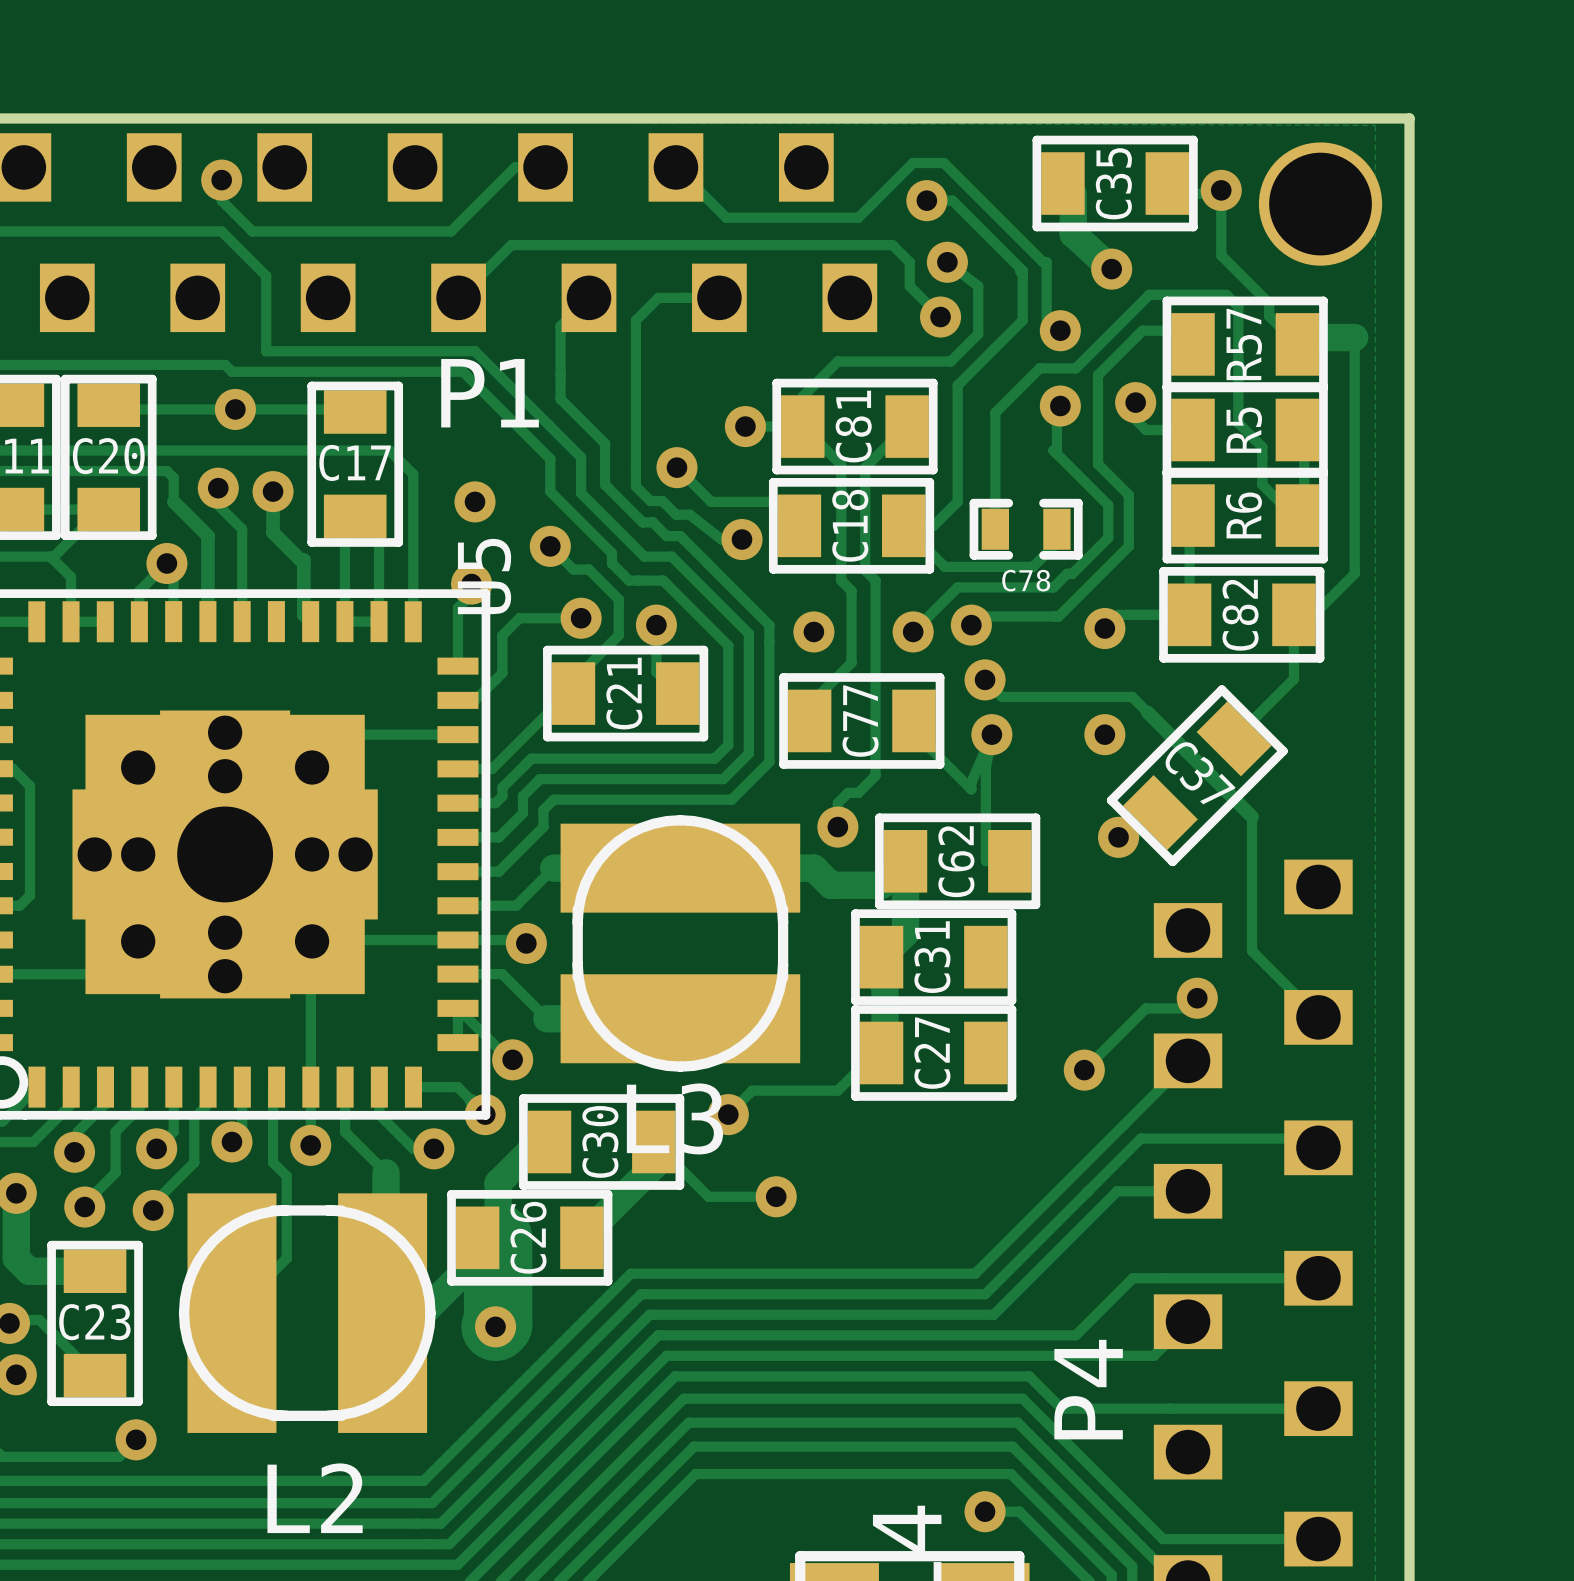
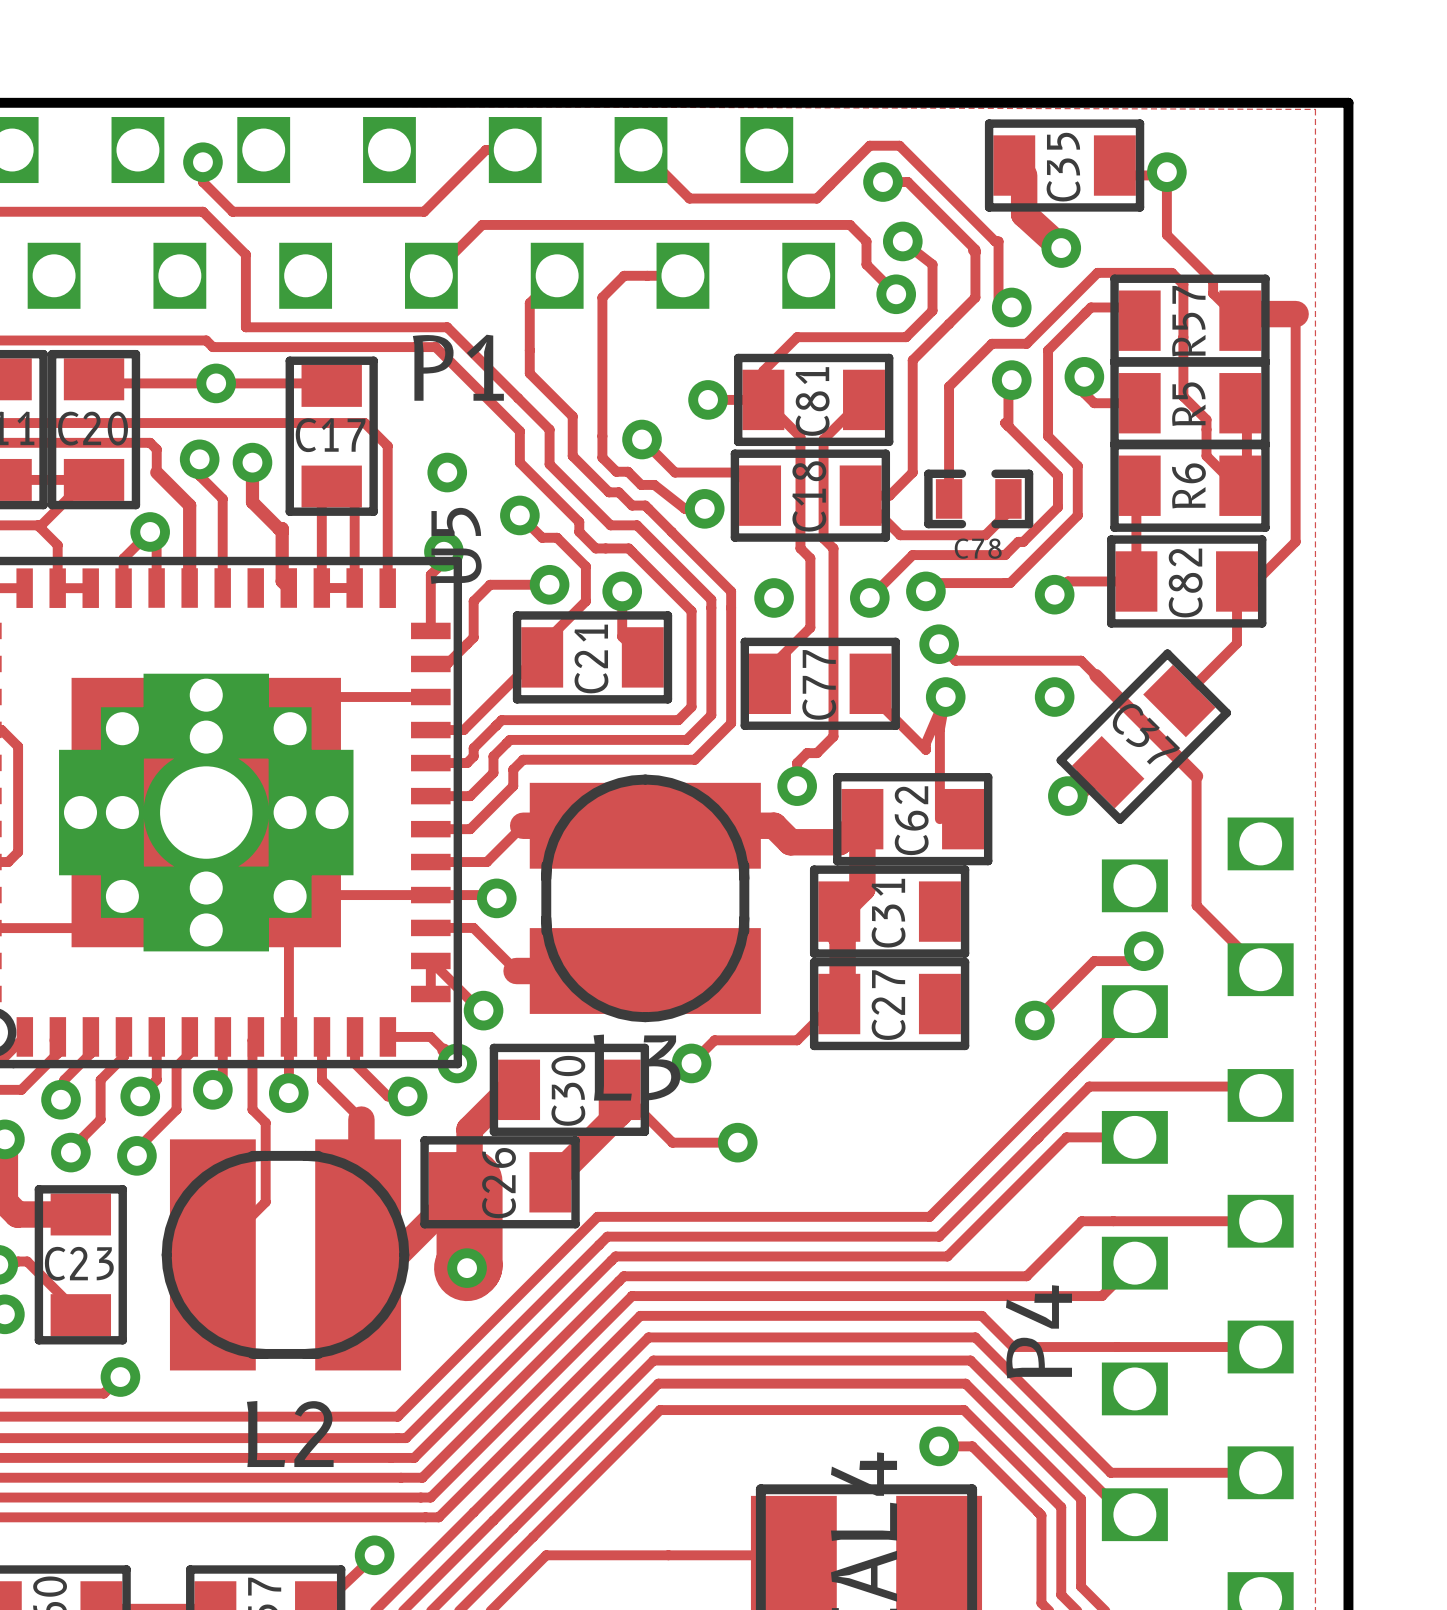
part: (1320, 204) -> none

